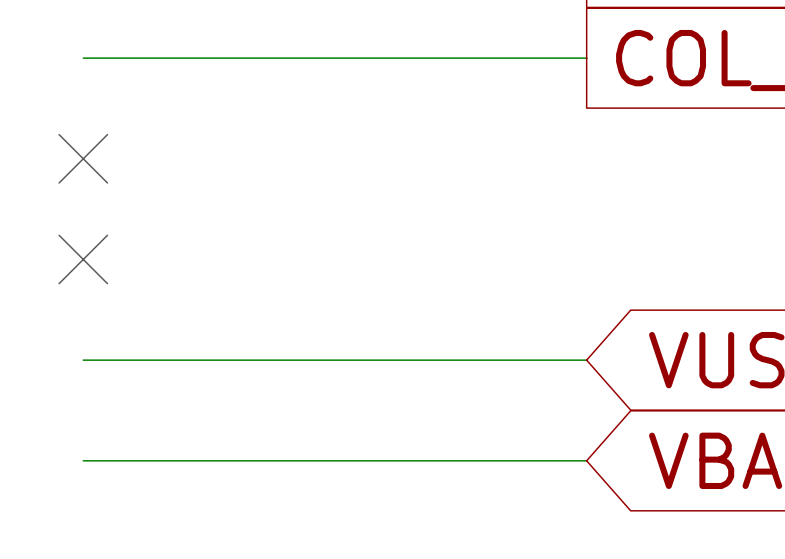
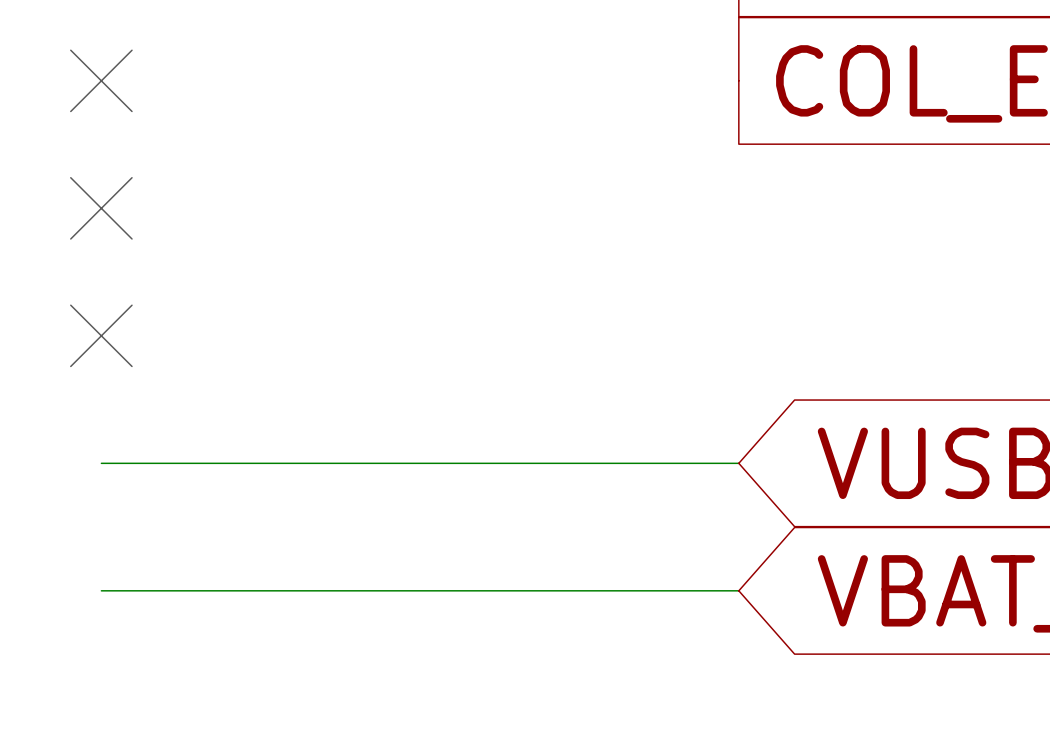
wire: (83, 58) (586, 58) -> none
no-connect mark: none -> (101, 80)

